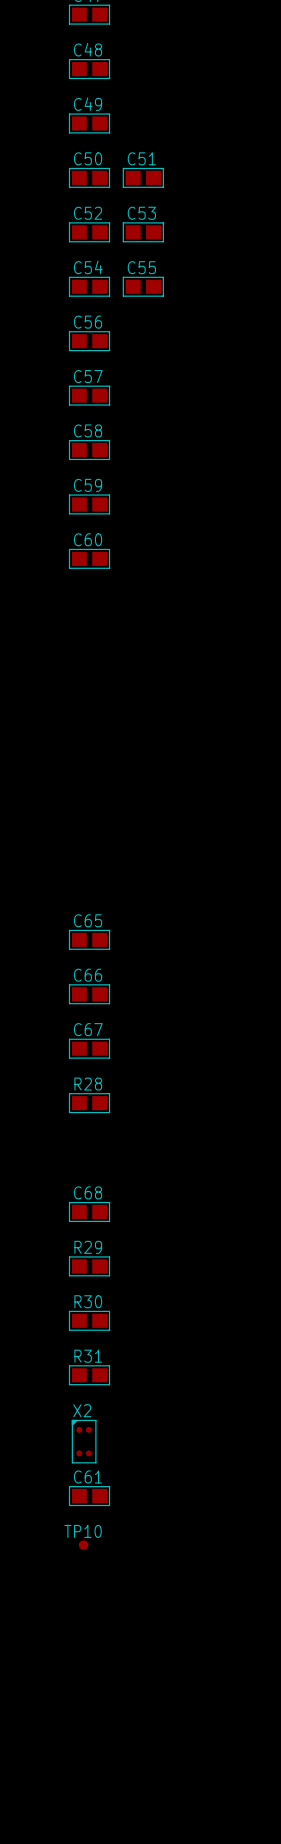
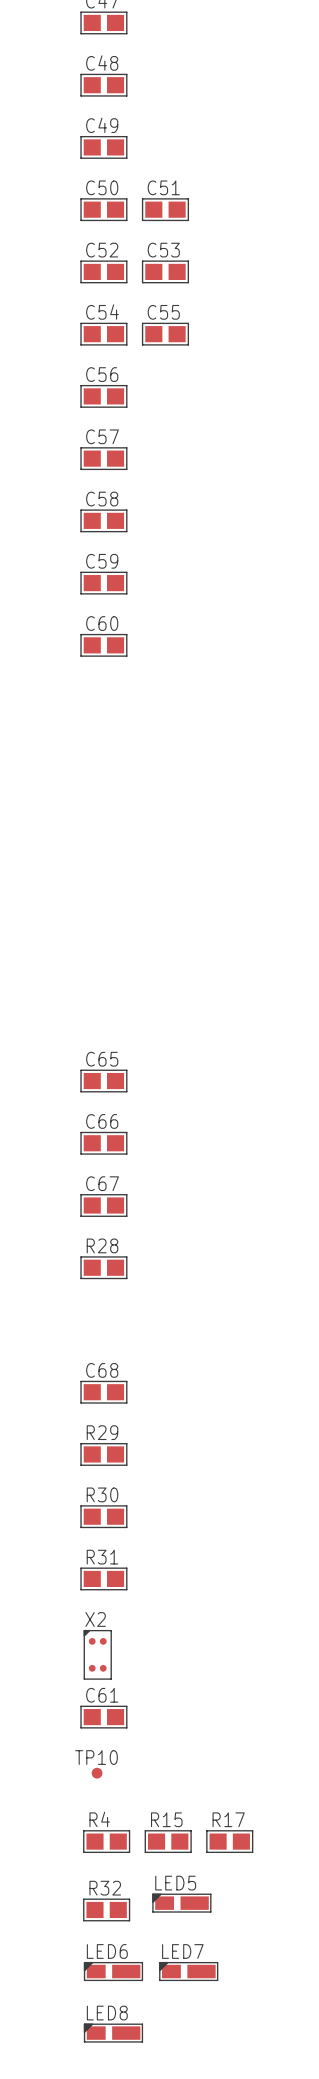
R4: none -> (106, 1841)
R15: none -> (168, 1841)
R17: none -> (229, 1841)
LED5: none -> (181, 1903)
R32: none -> (106, 1909)
LED6: none -> (113, 1971)
LED7: none -> (188, 1971)
LED8: none -> (113, 2033)

